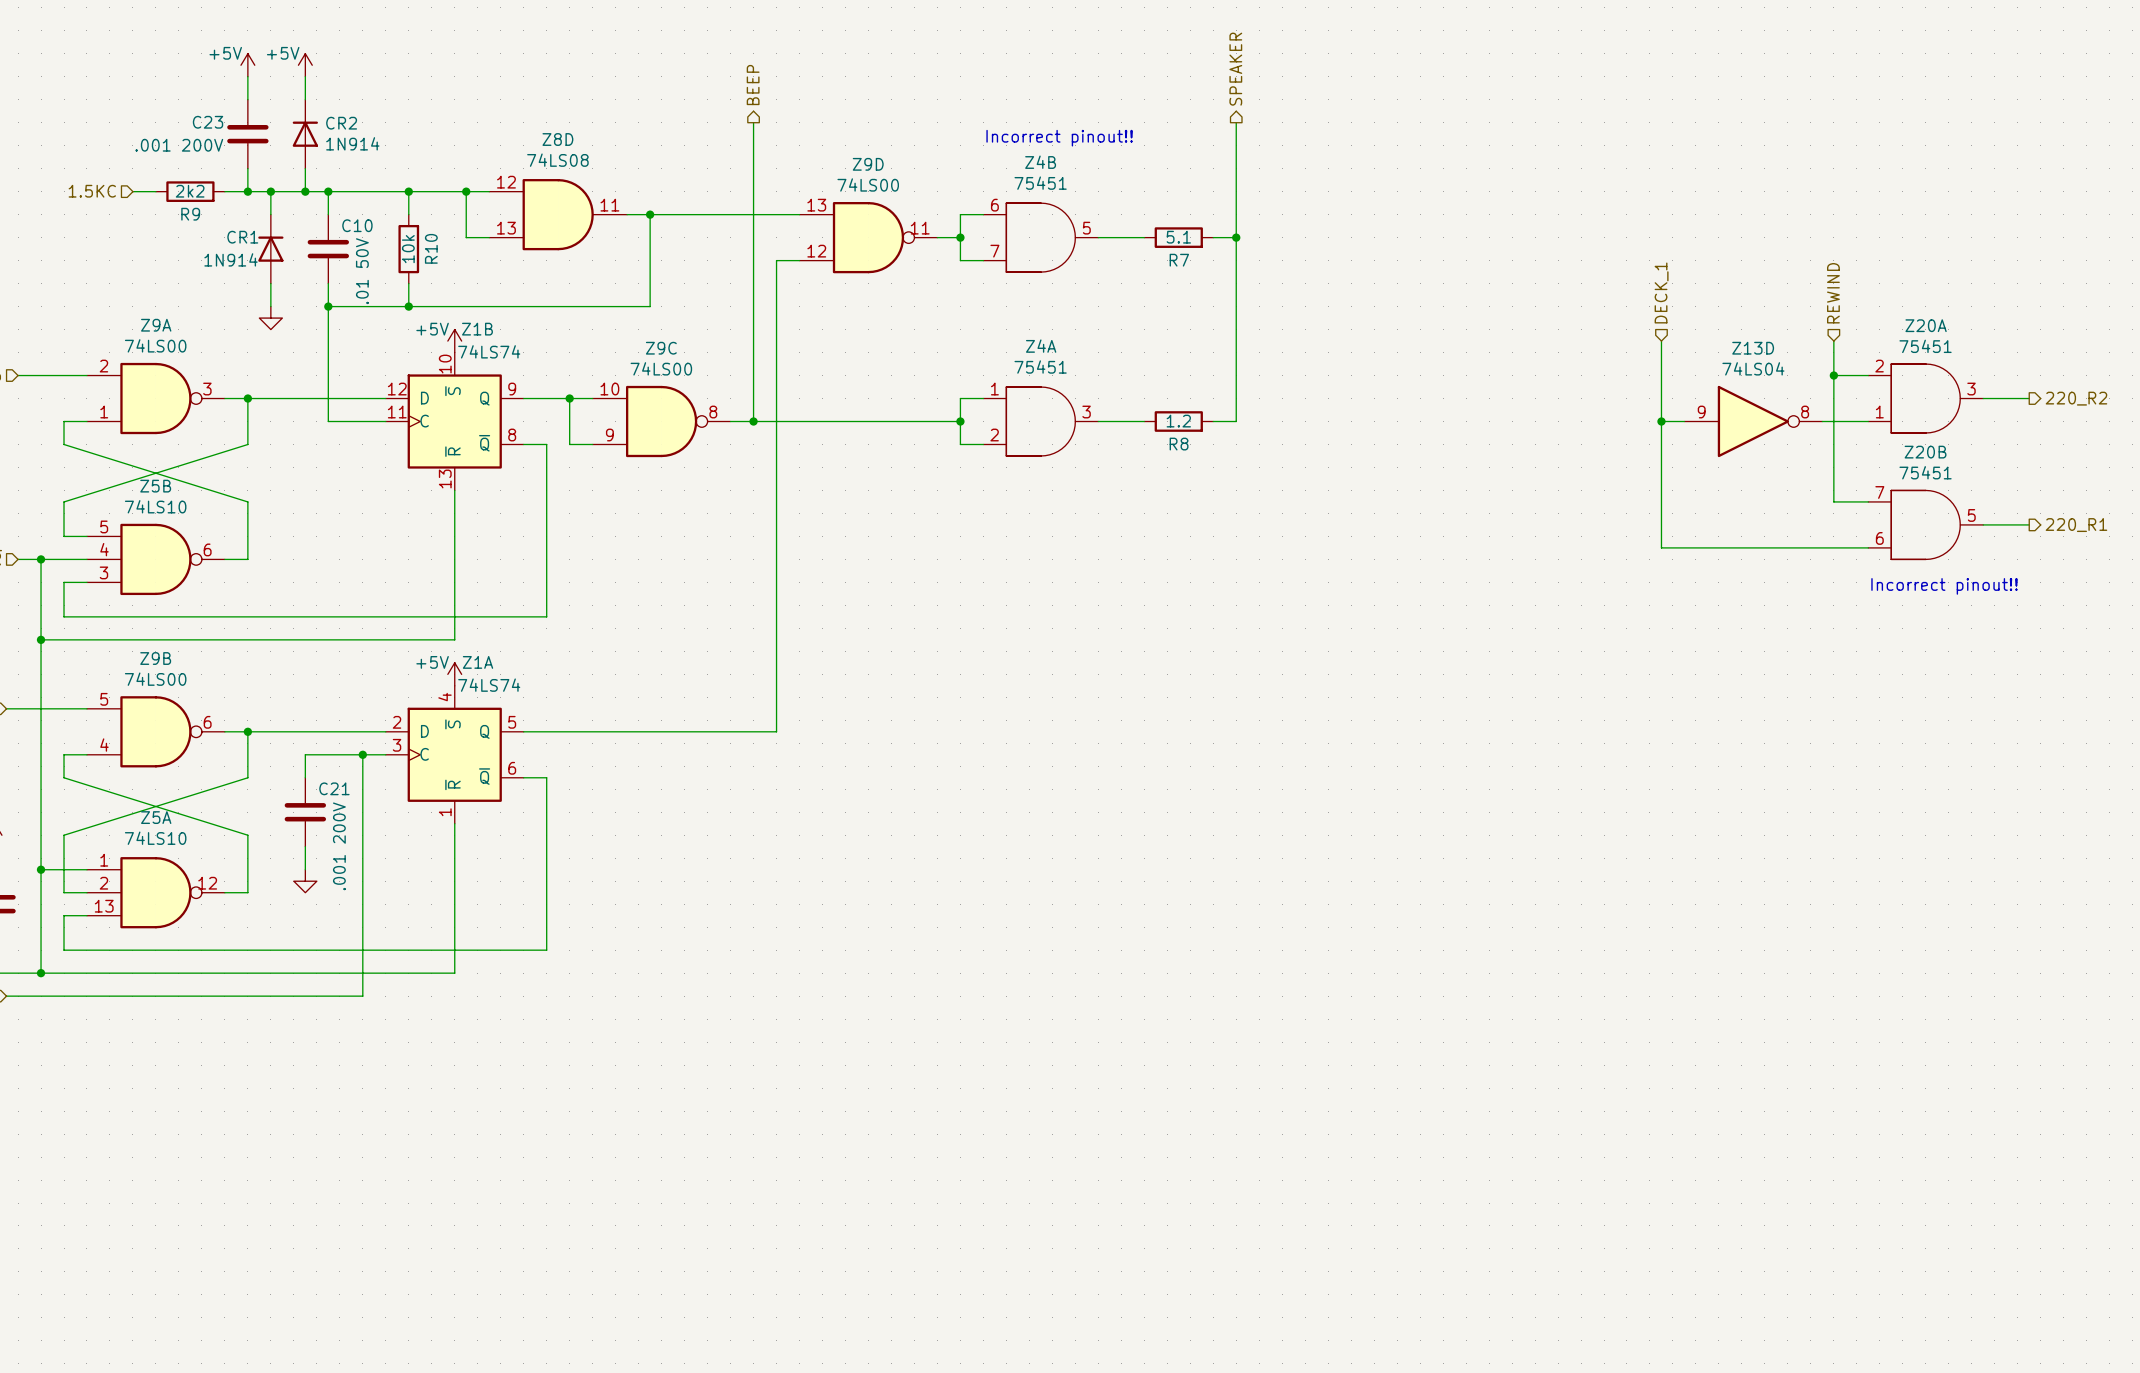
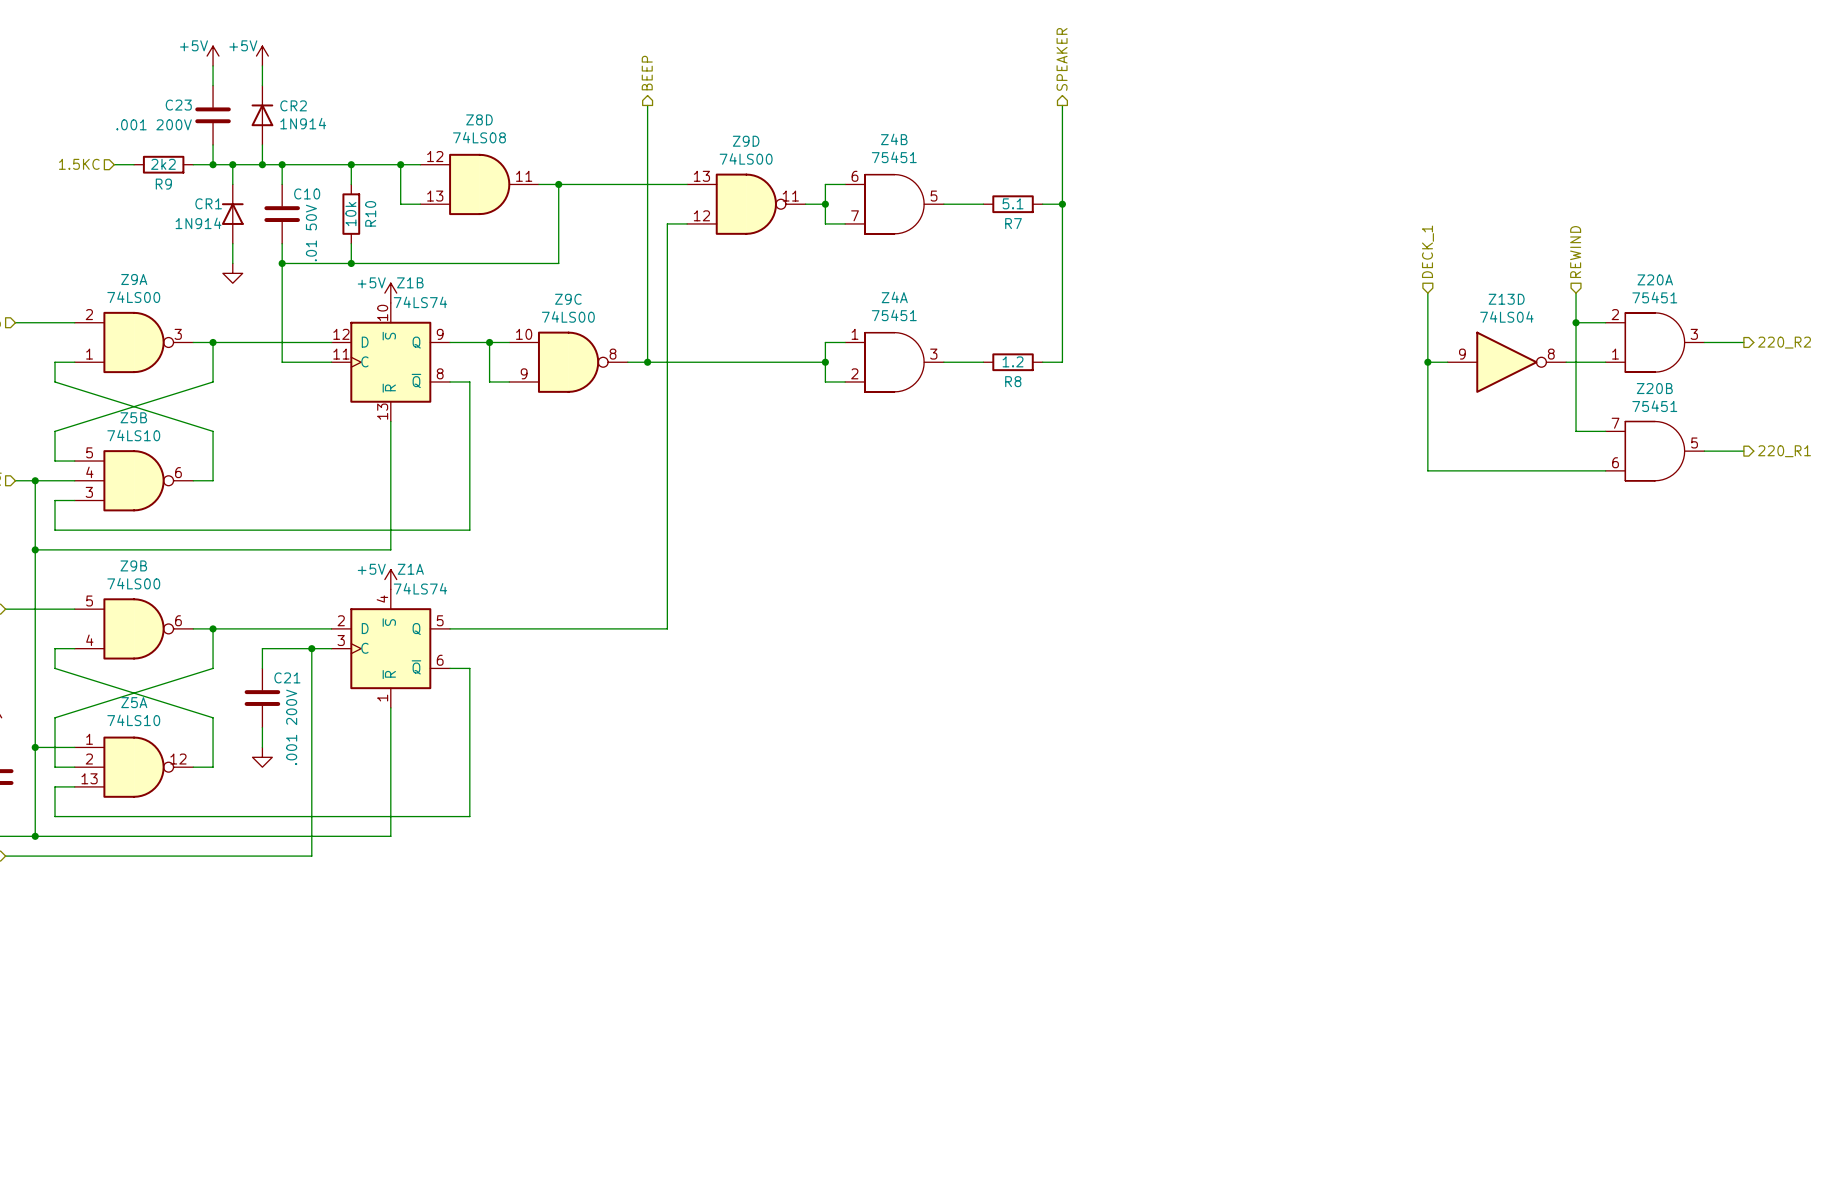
text: Incorrect pinout!! (1059, 138) -> none
text: Incorrect pinout!! (1944, 586) -> none

